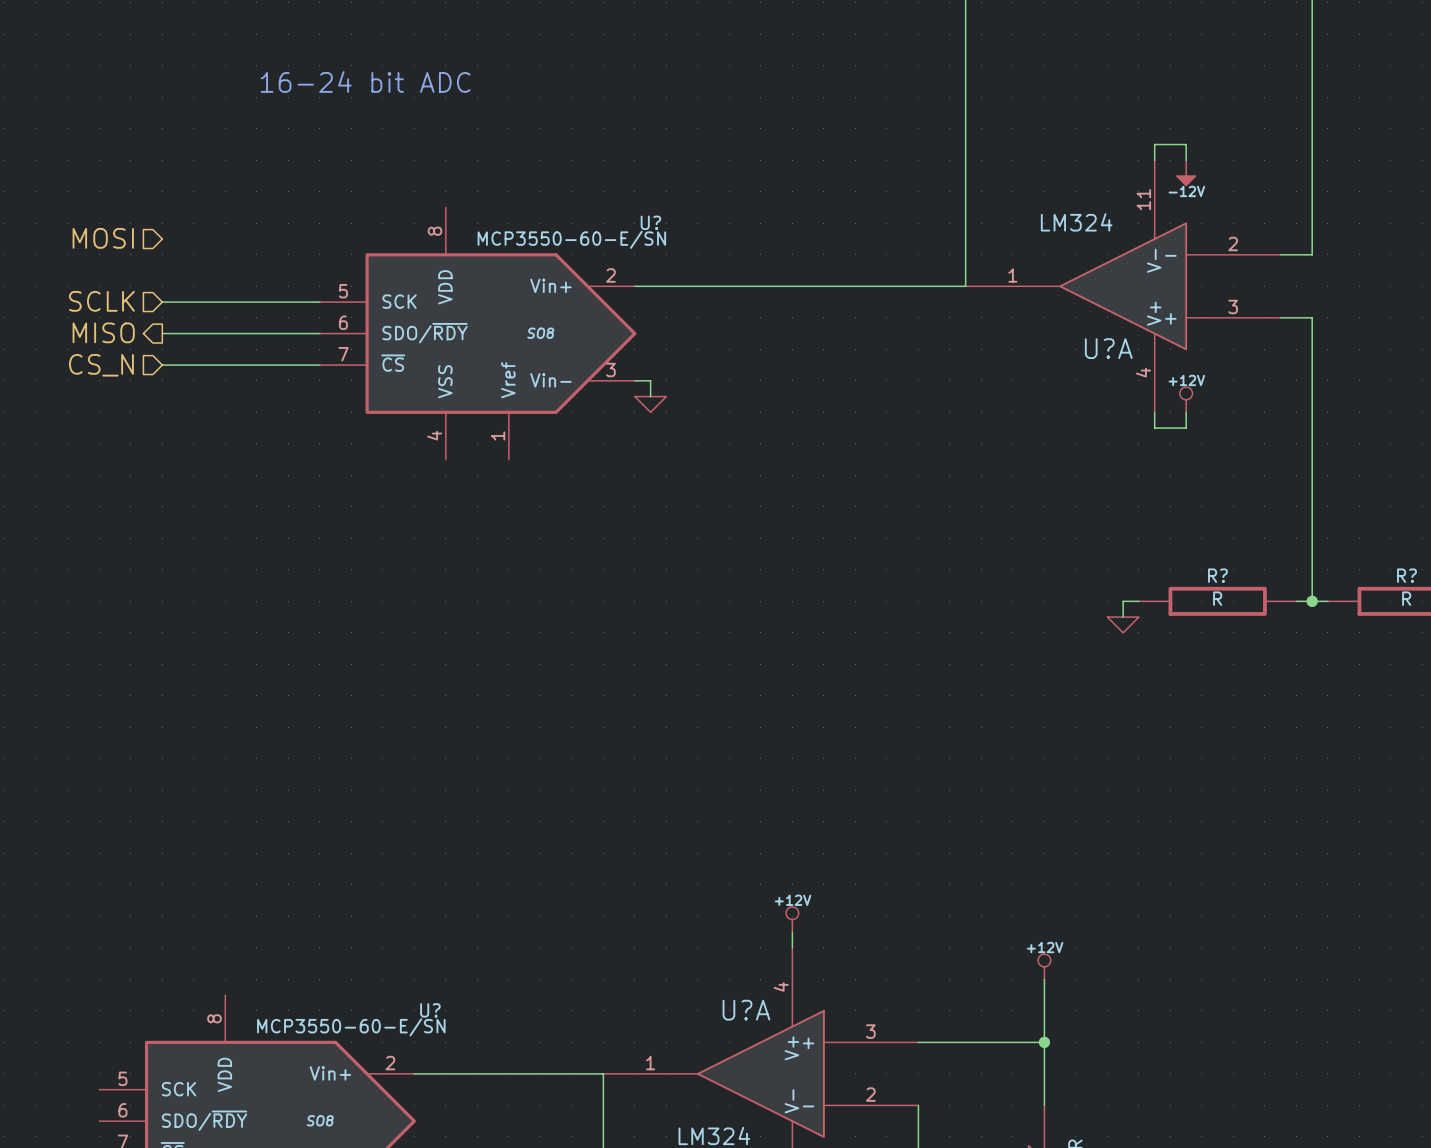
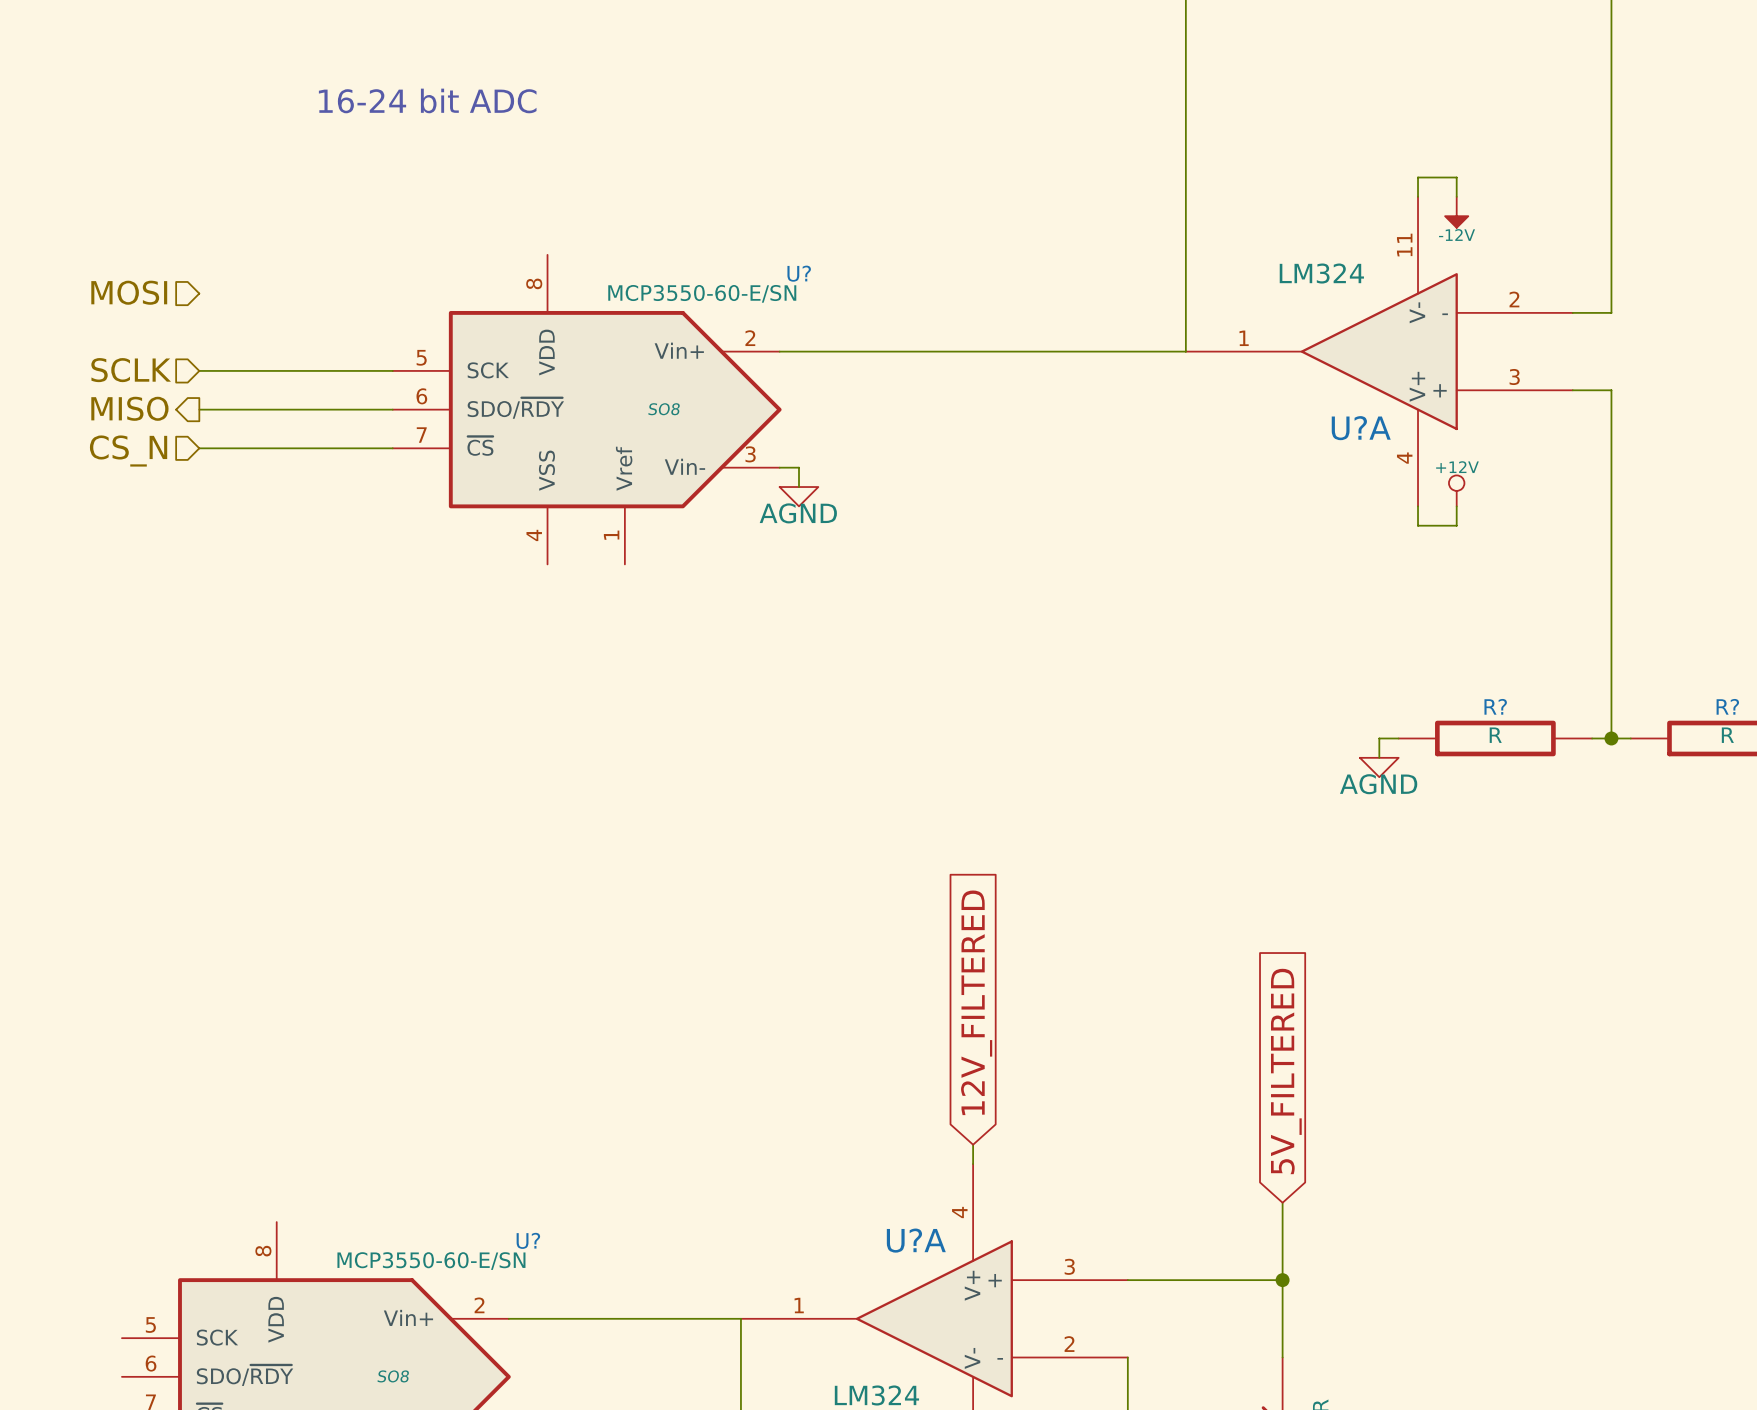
power symbol text: none -> AGND (798, 513)
power symbol text: none -> AGND (1378, 784)
global label: none -> 12V_FILTERED (976, 1002)
global label: none -> 5V_FILTERED (1286, 1071)
power symbol: +12V (792, 919) -> none
power symbol: +12V (1044, 966) -> none

